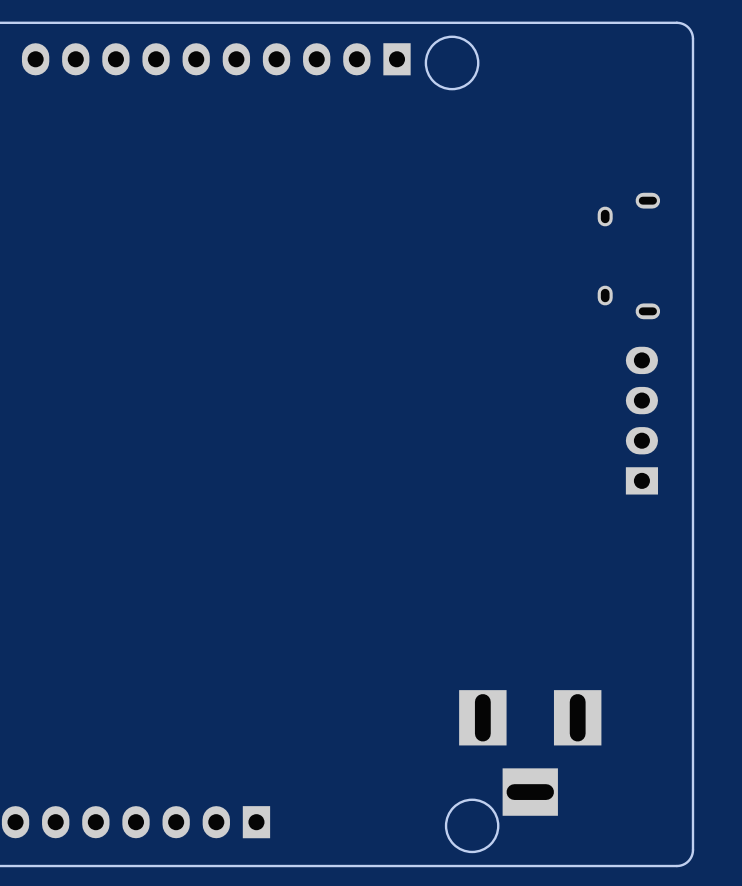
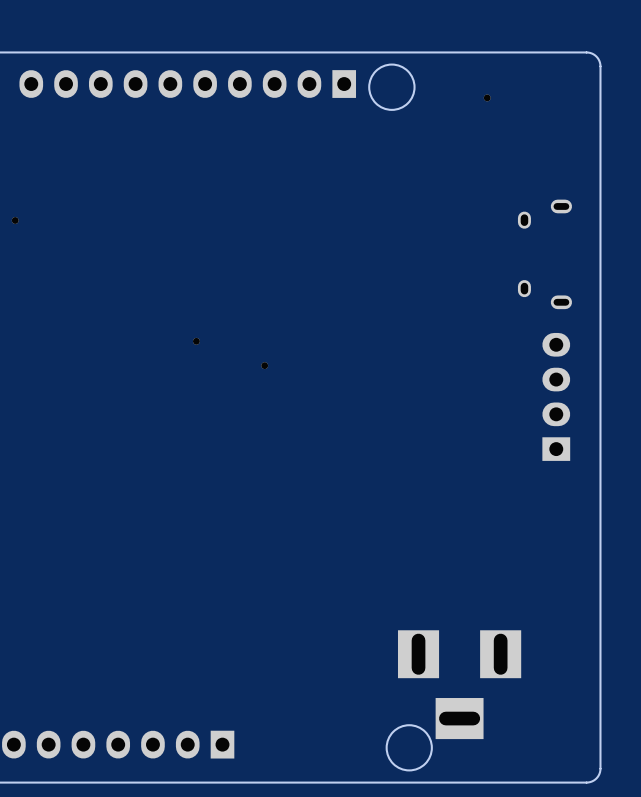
part: none -> (487, 97)
part: none -> (15, 220)
part: none -> (196, 341)
part: none -> (264, 365)

